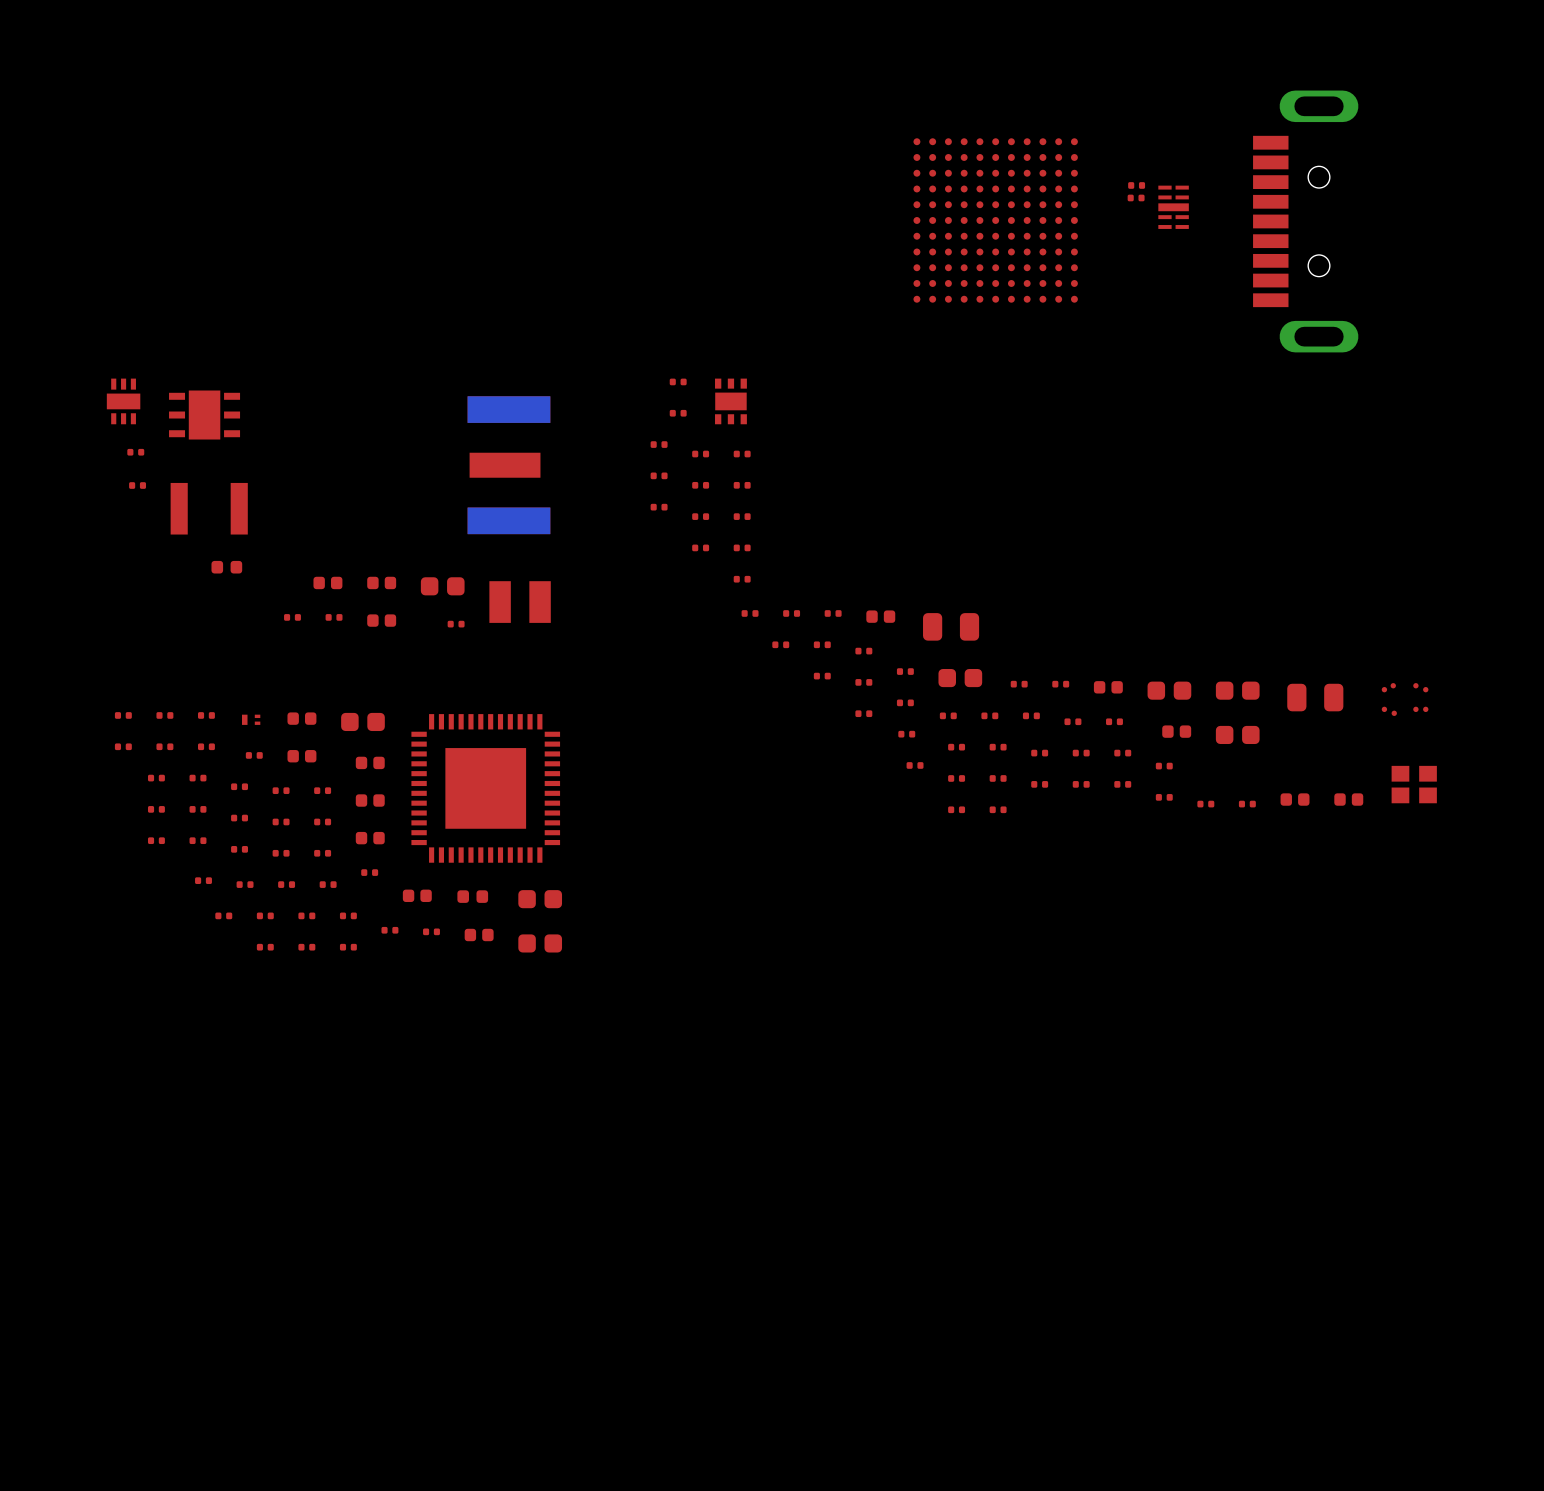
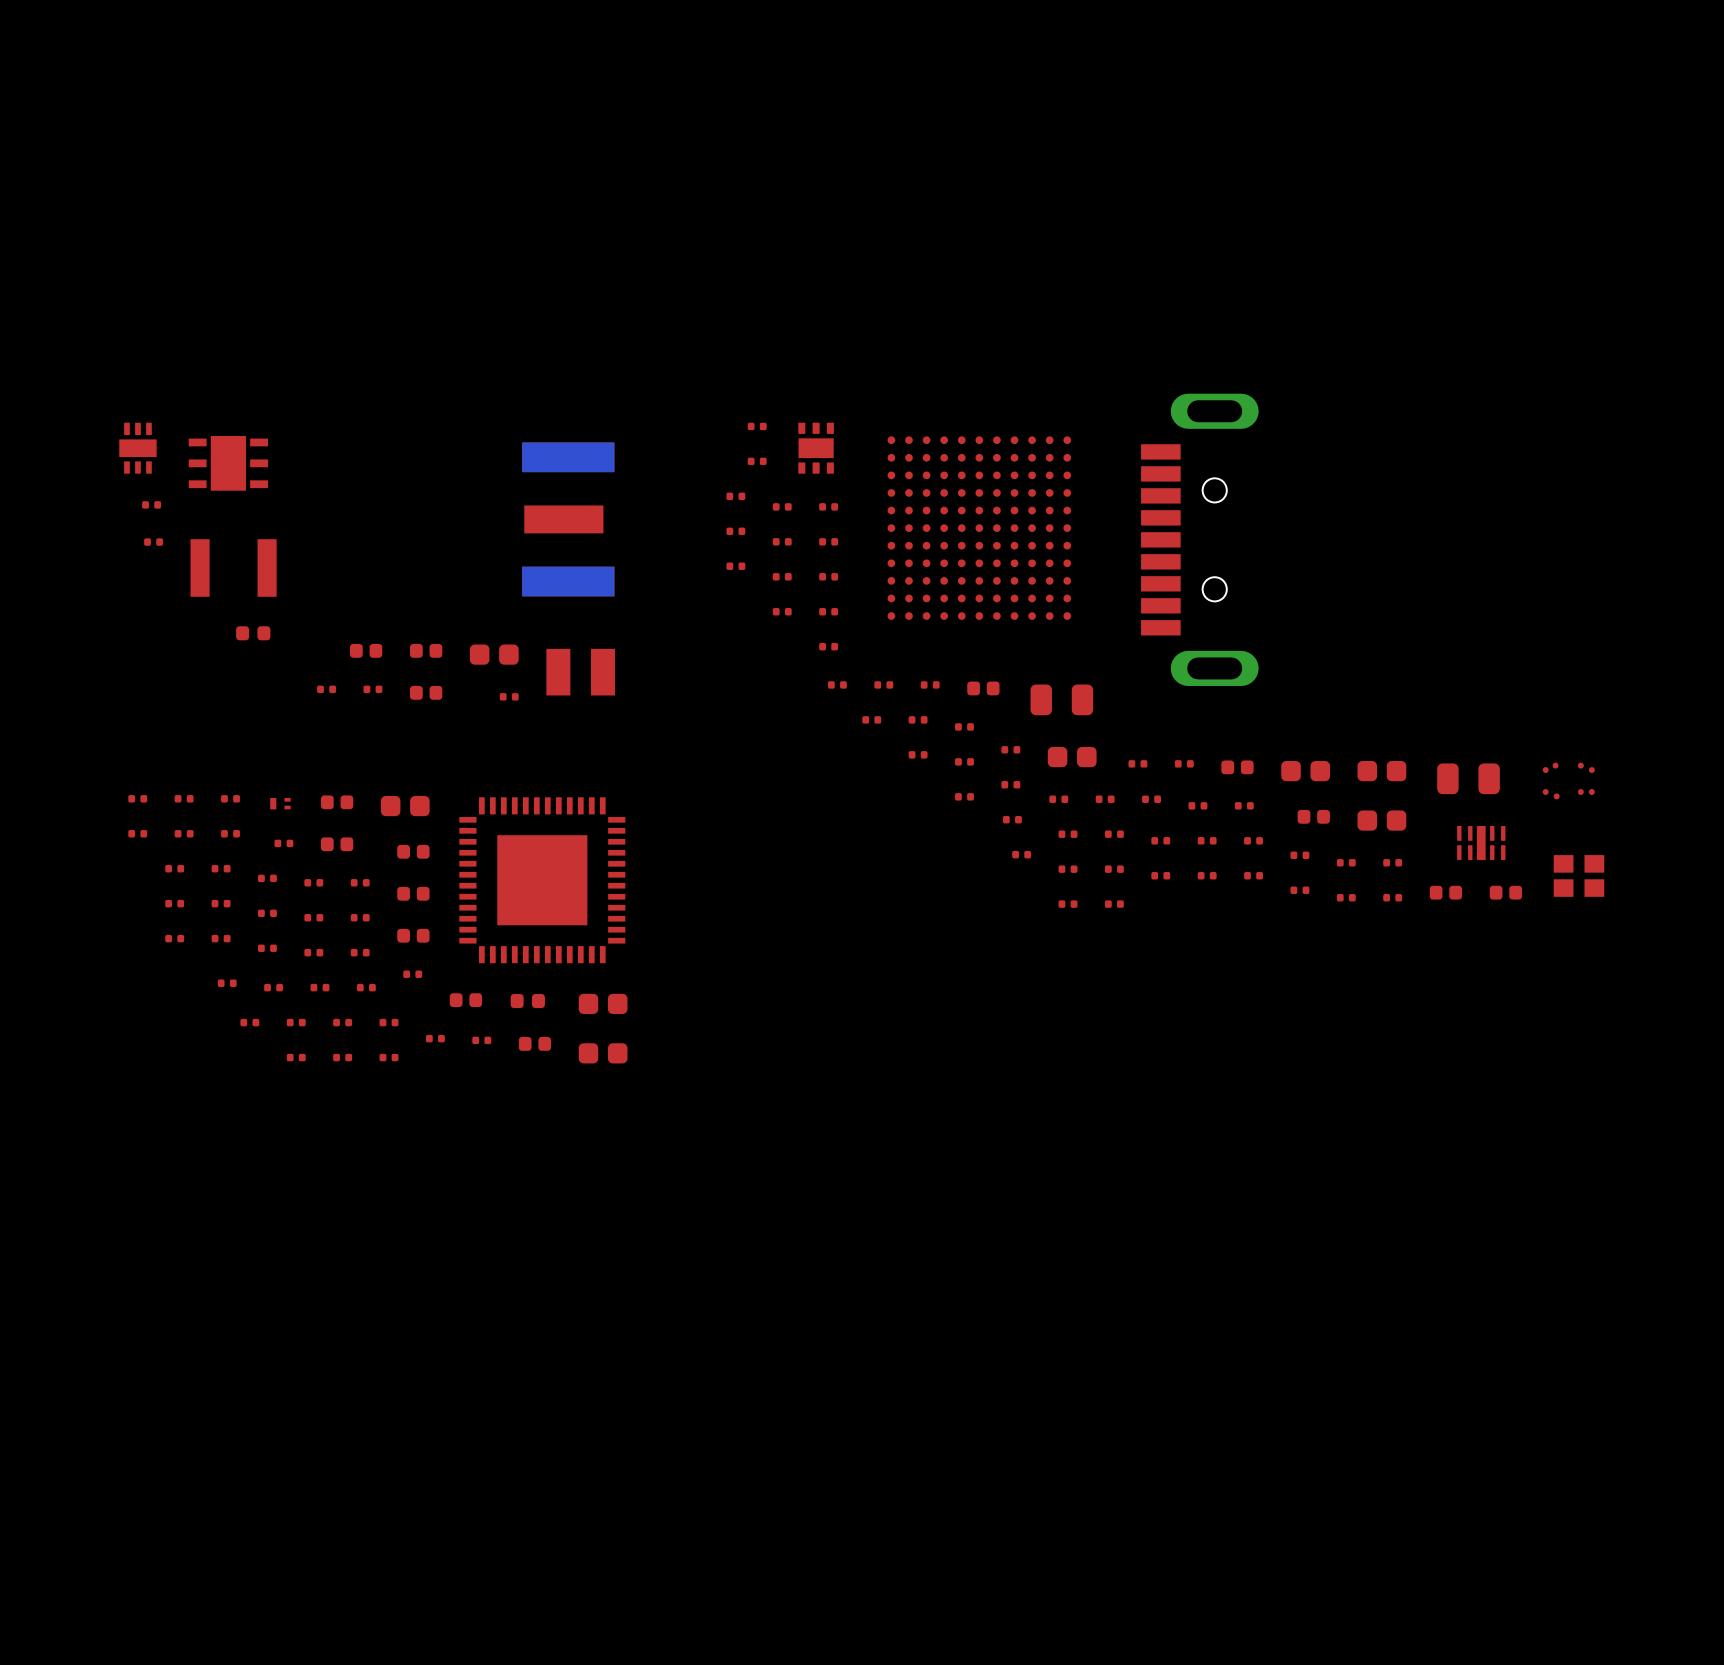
part: (1136, 185) -> none
part: (1136, 197) -> none
part: (1173, 207) -> none
part position: (995, 220) -> (979, 528)
part position: (1305, 221) -> (1199, 539)
part: none -> (1481, 843)
part: none -> (1346, 862)
part: none -> (1392, 862)

